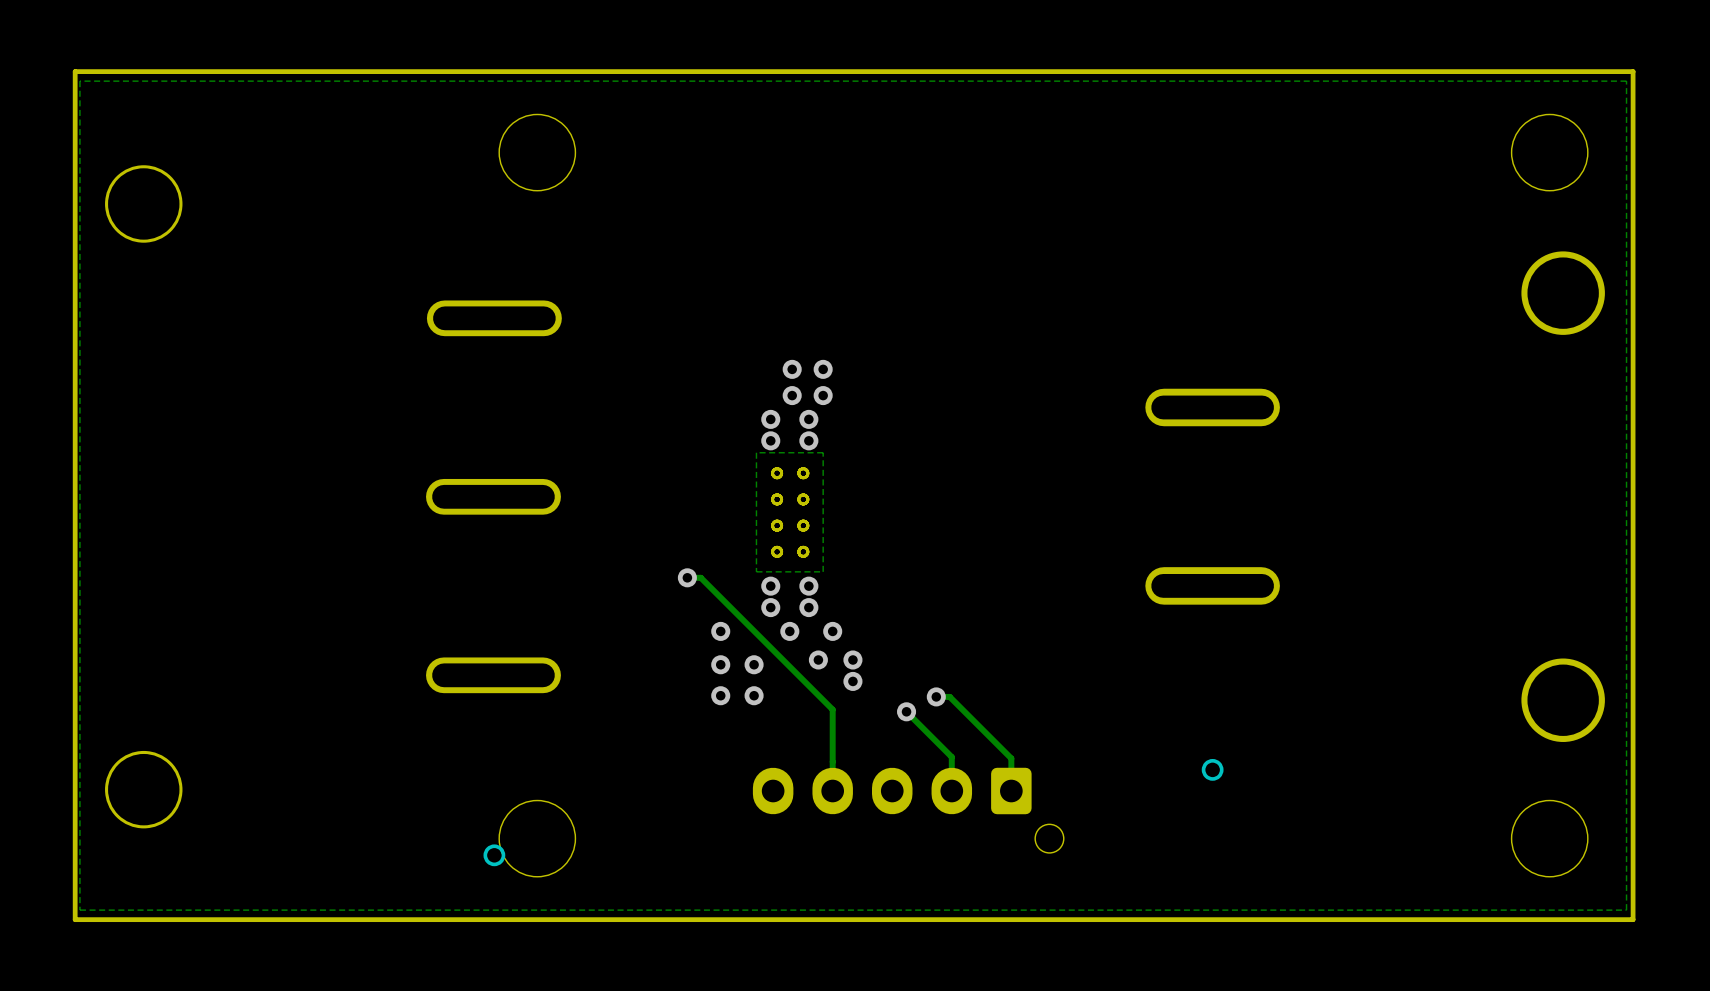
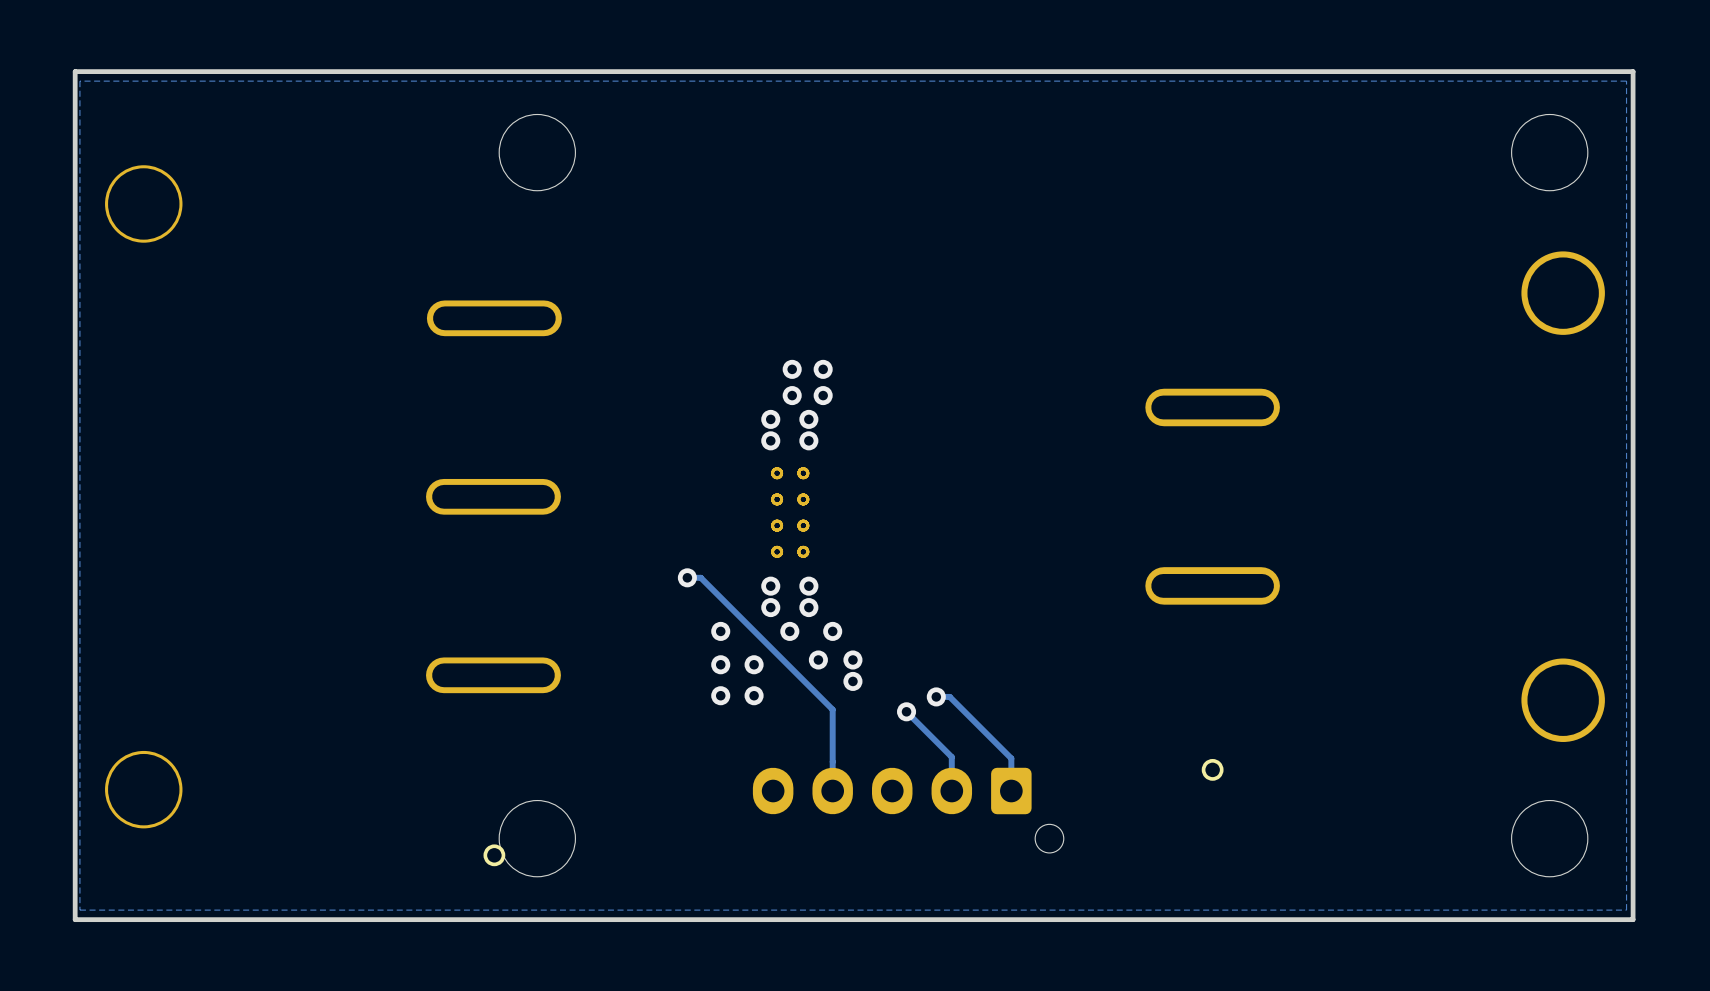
zone outline: (823, 452) (756, 452) (756, 571) (823, 571) (823, 452) -> none

